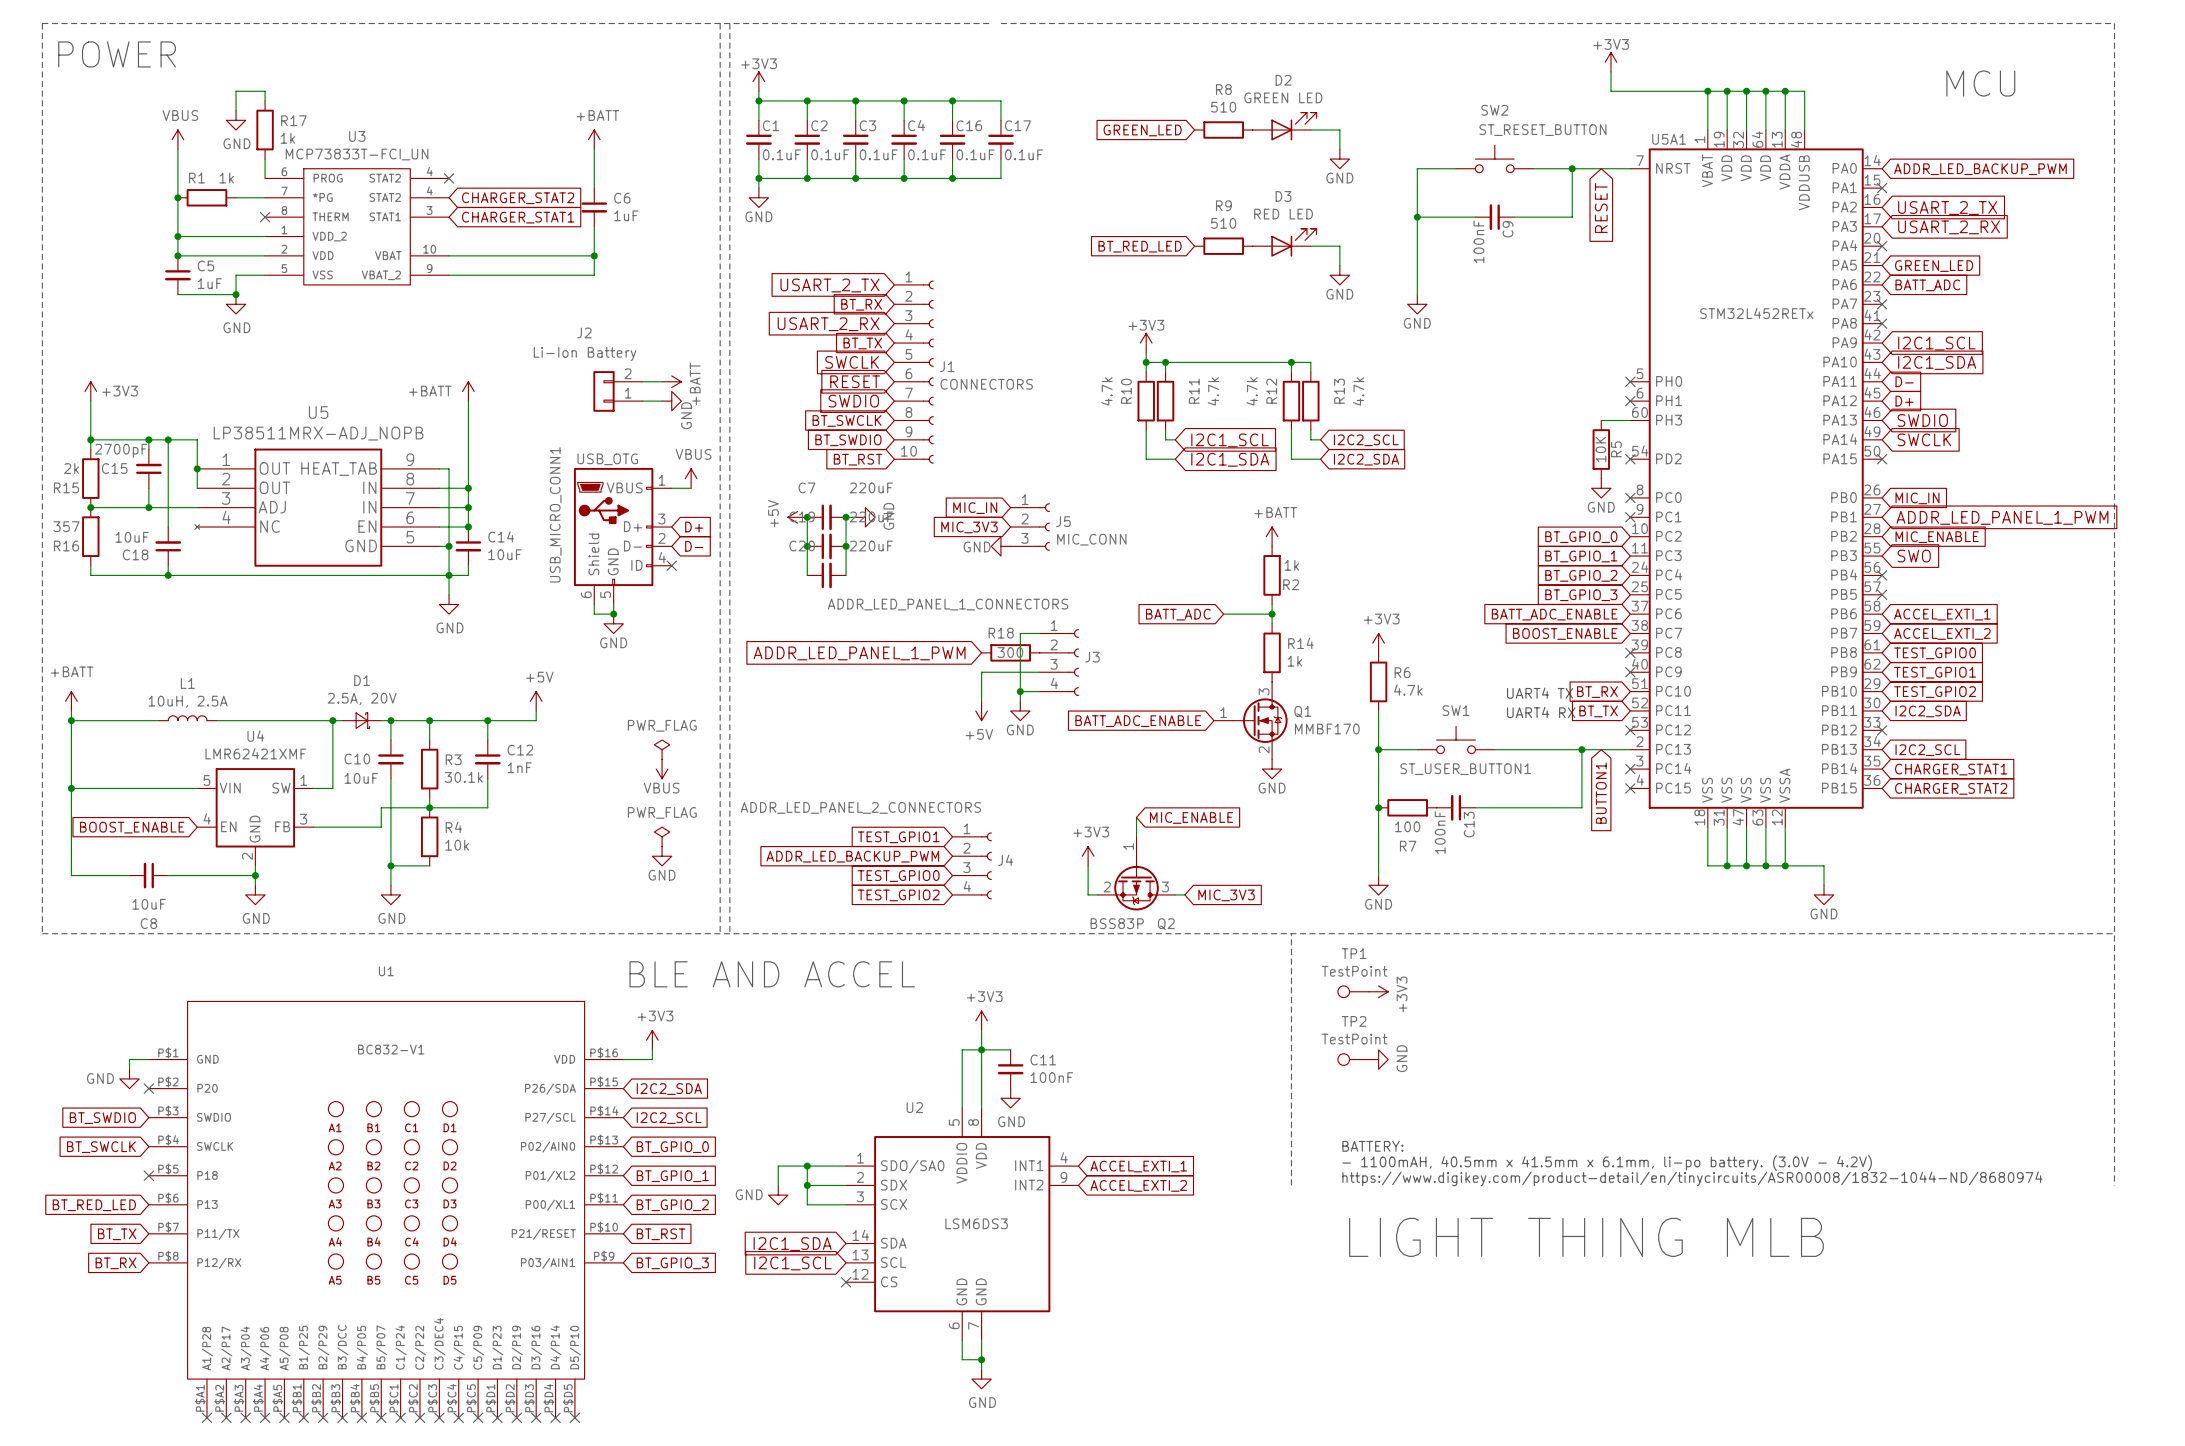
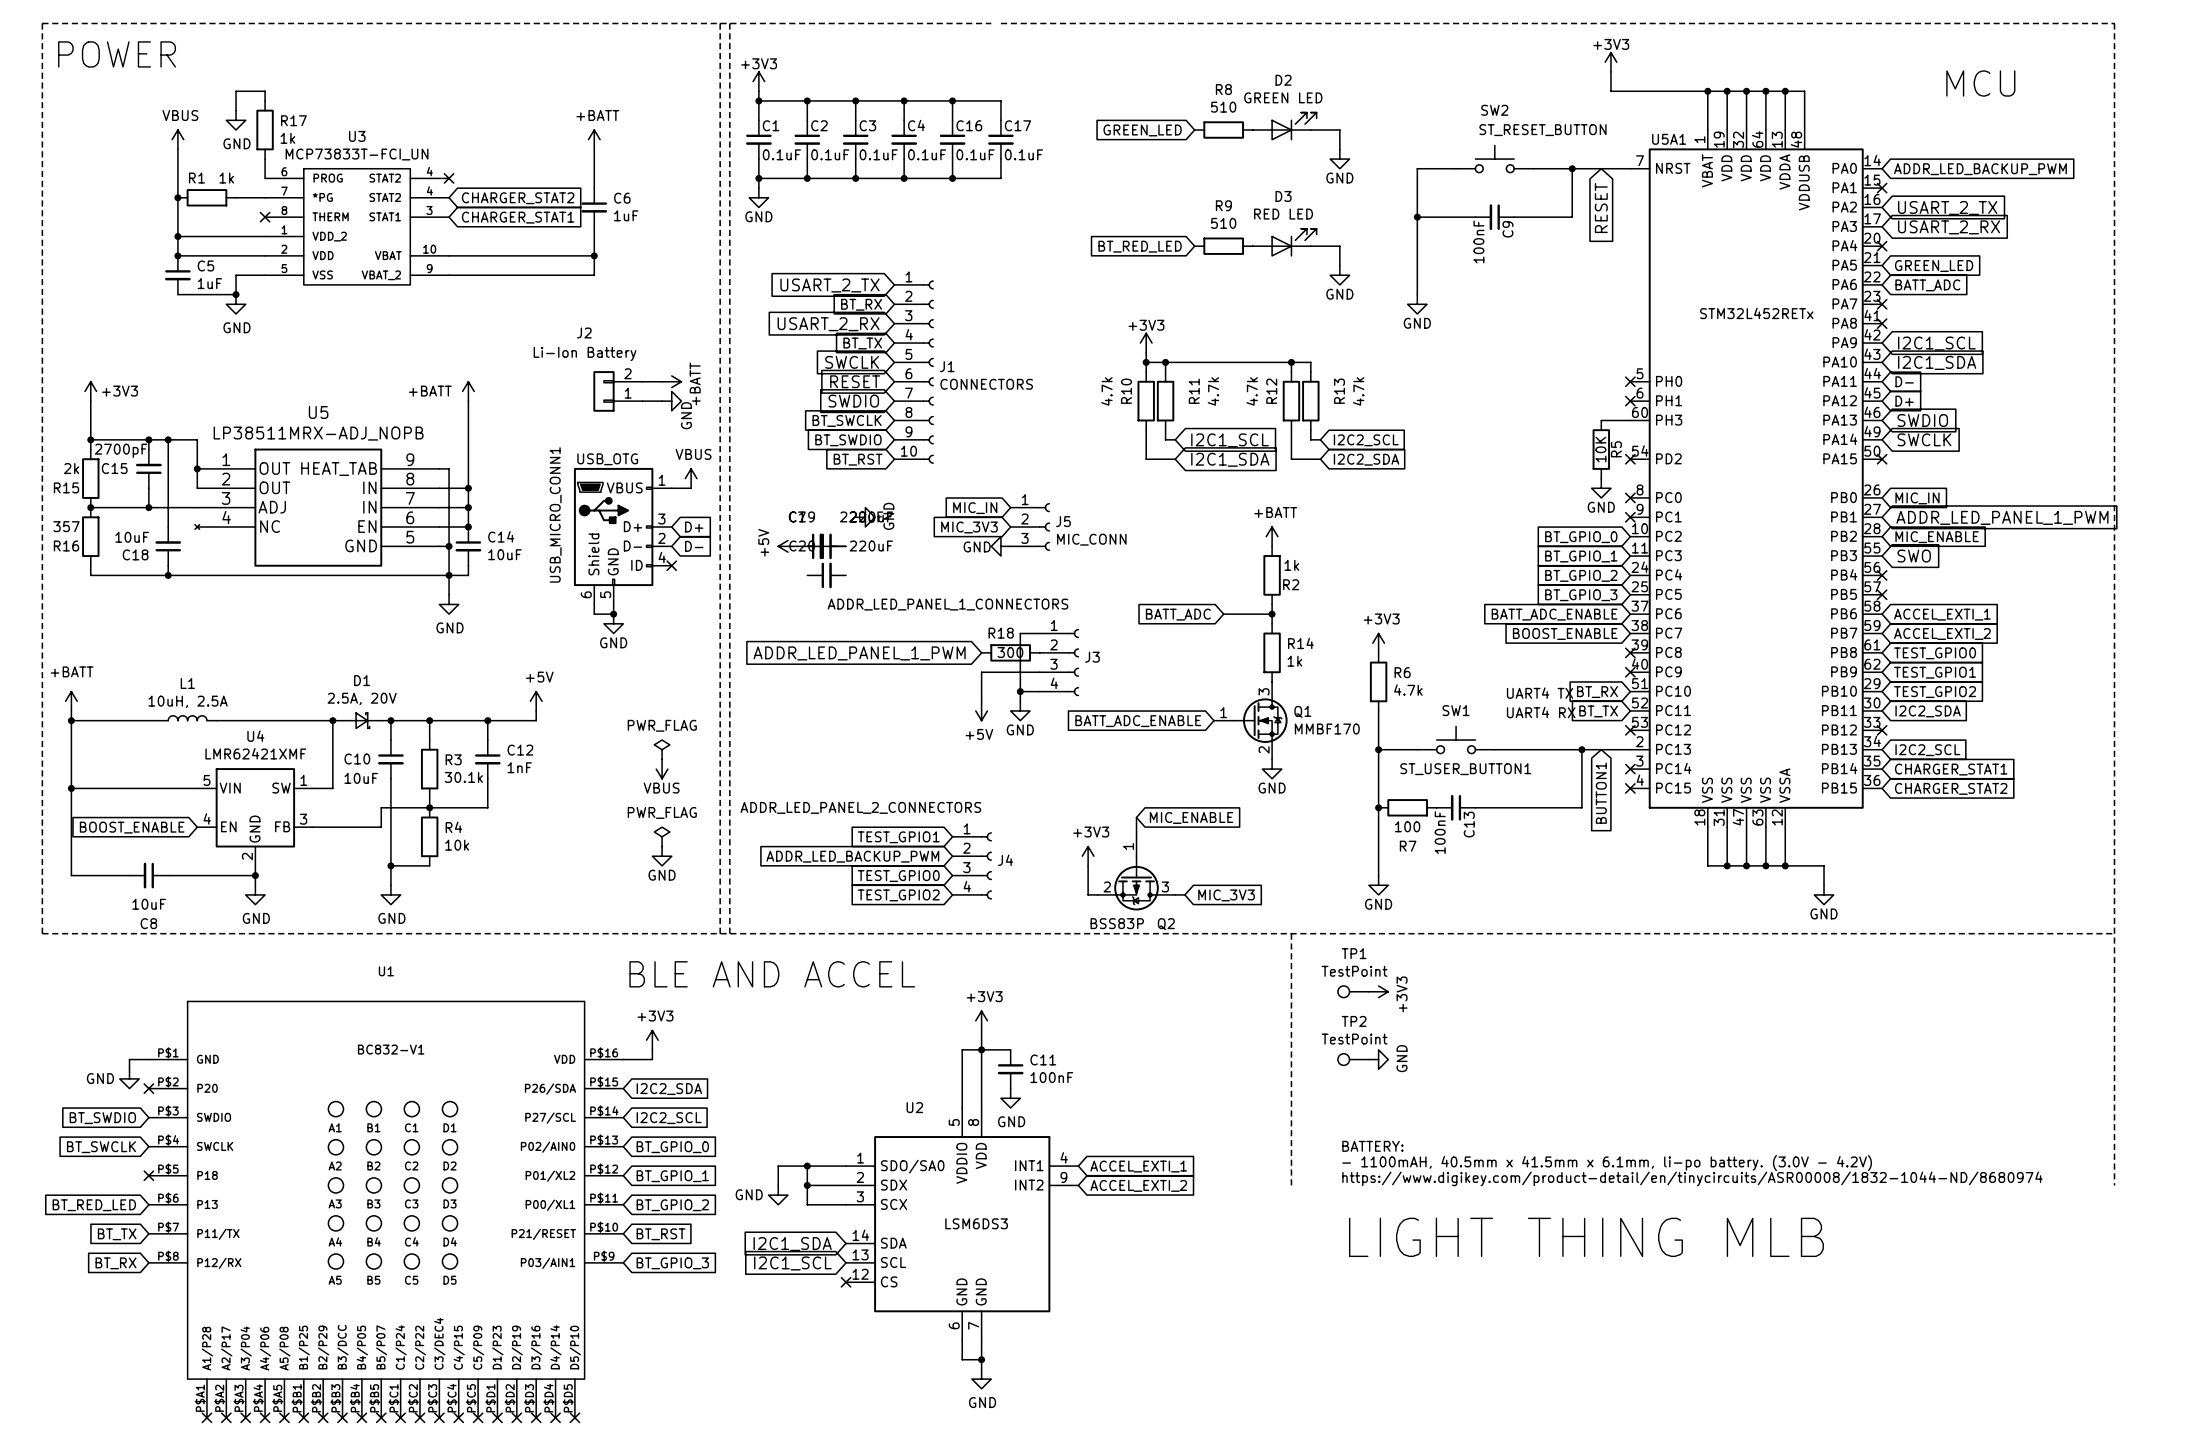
power symbol position: +5V (797, 517) -> +5V (787, 546)
wire: (807, 517) (807, 575) -> none
junction: (807, 517) -> none
C7 position: (826, 517) -> (816, 546)
junction: (846, 517) -> none
wire: (855, 517) (846, 517) (846, 575) -> none
junction: (807, 546) -> none
junction: (846, 546) -> none

